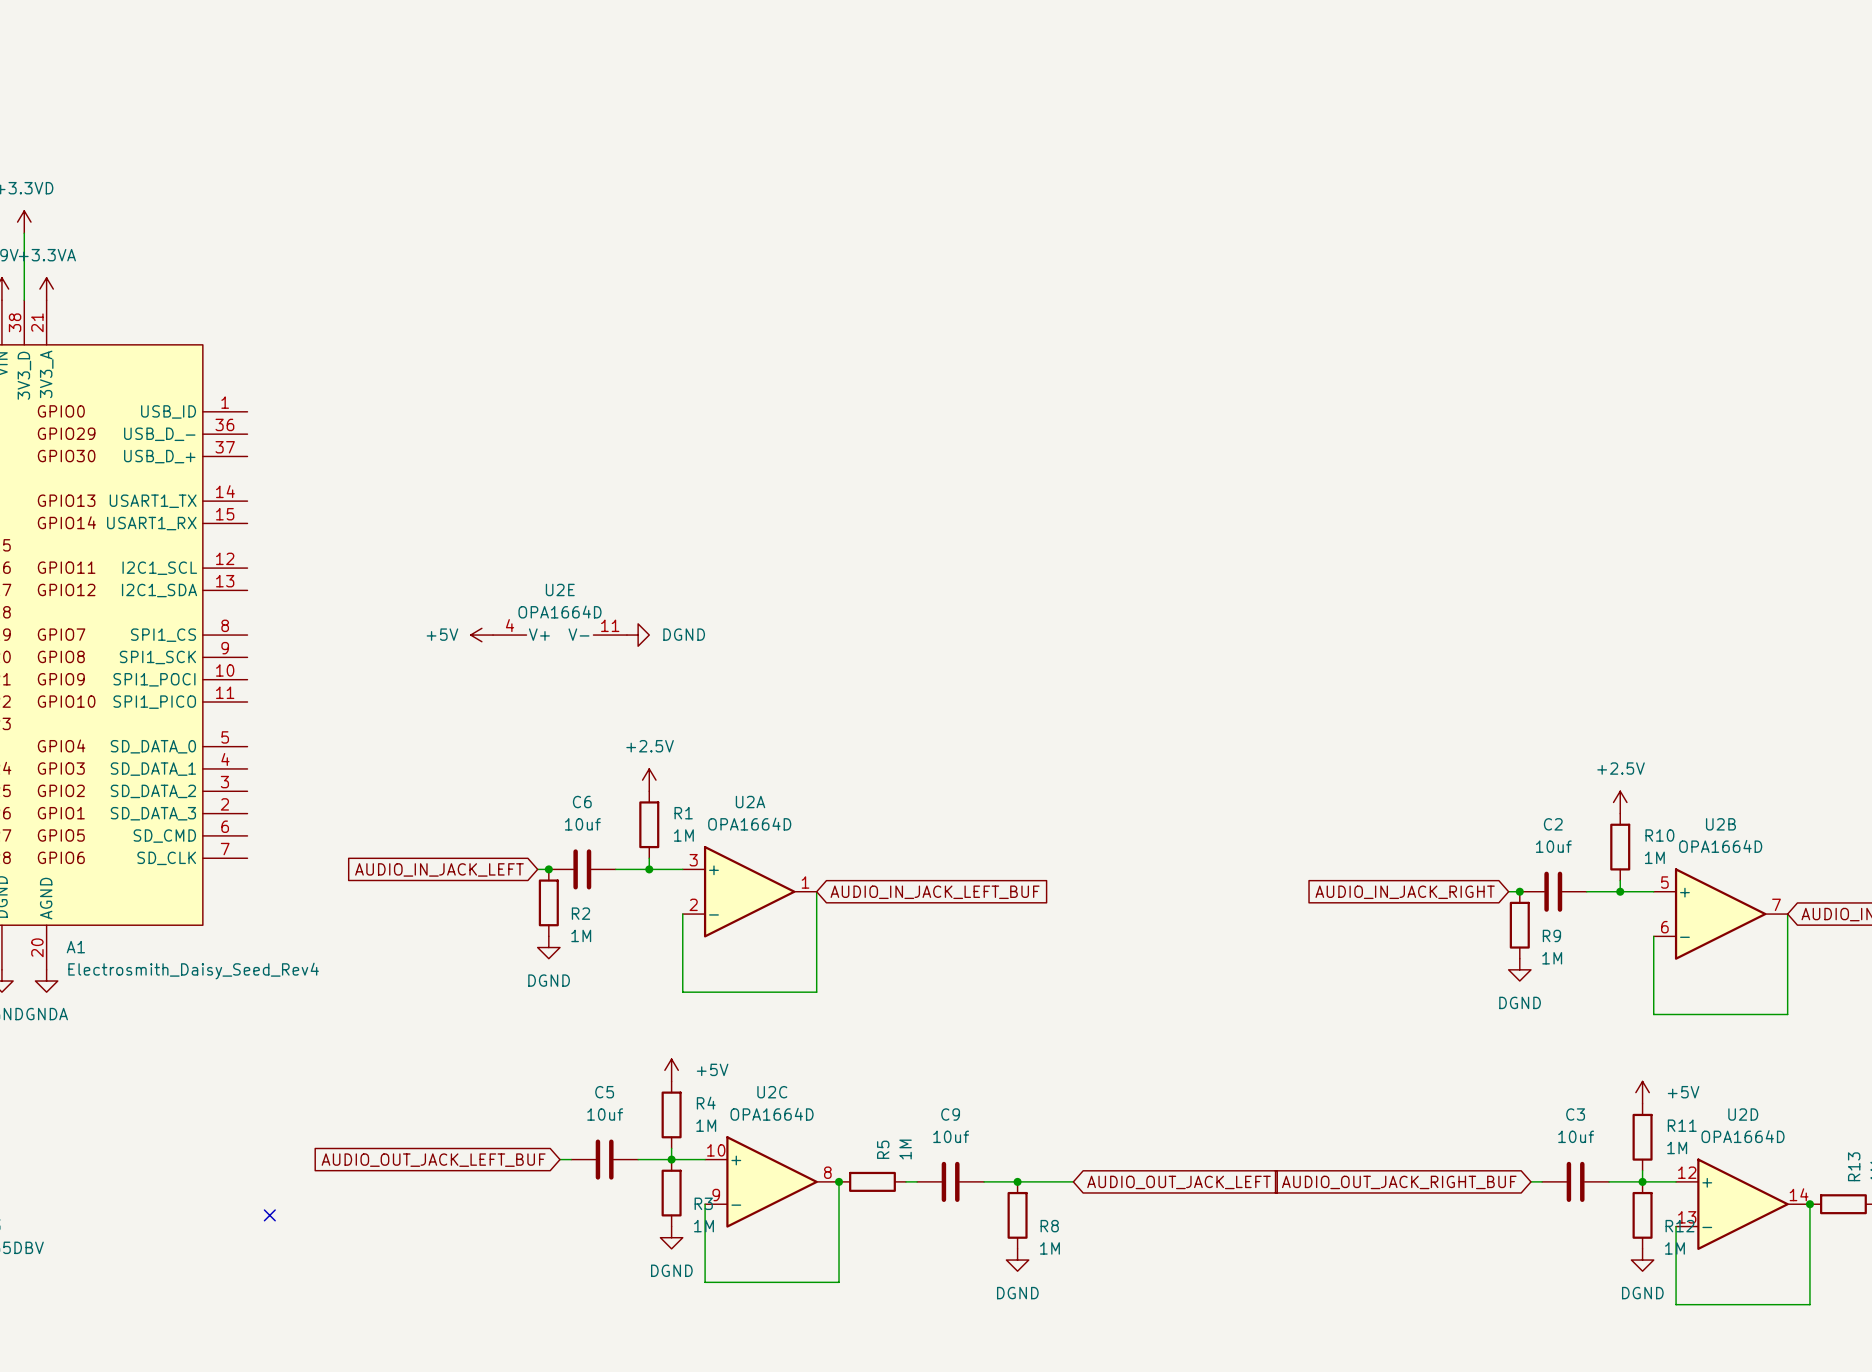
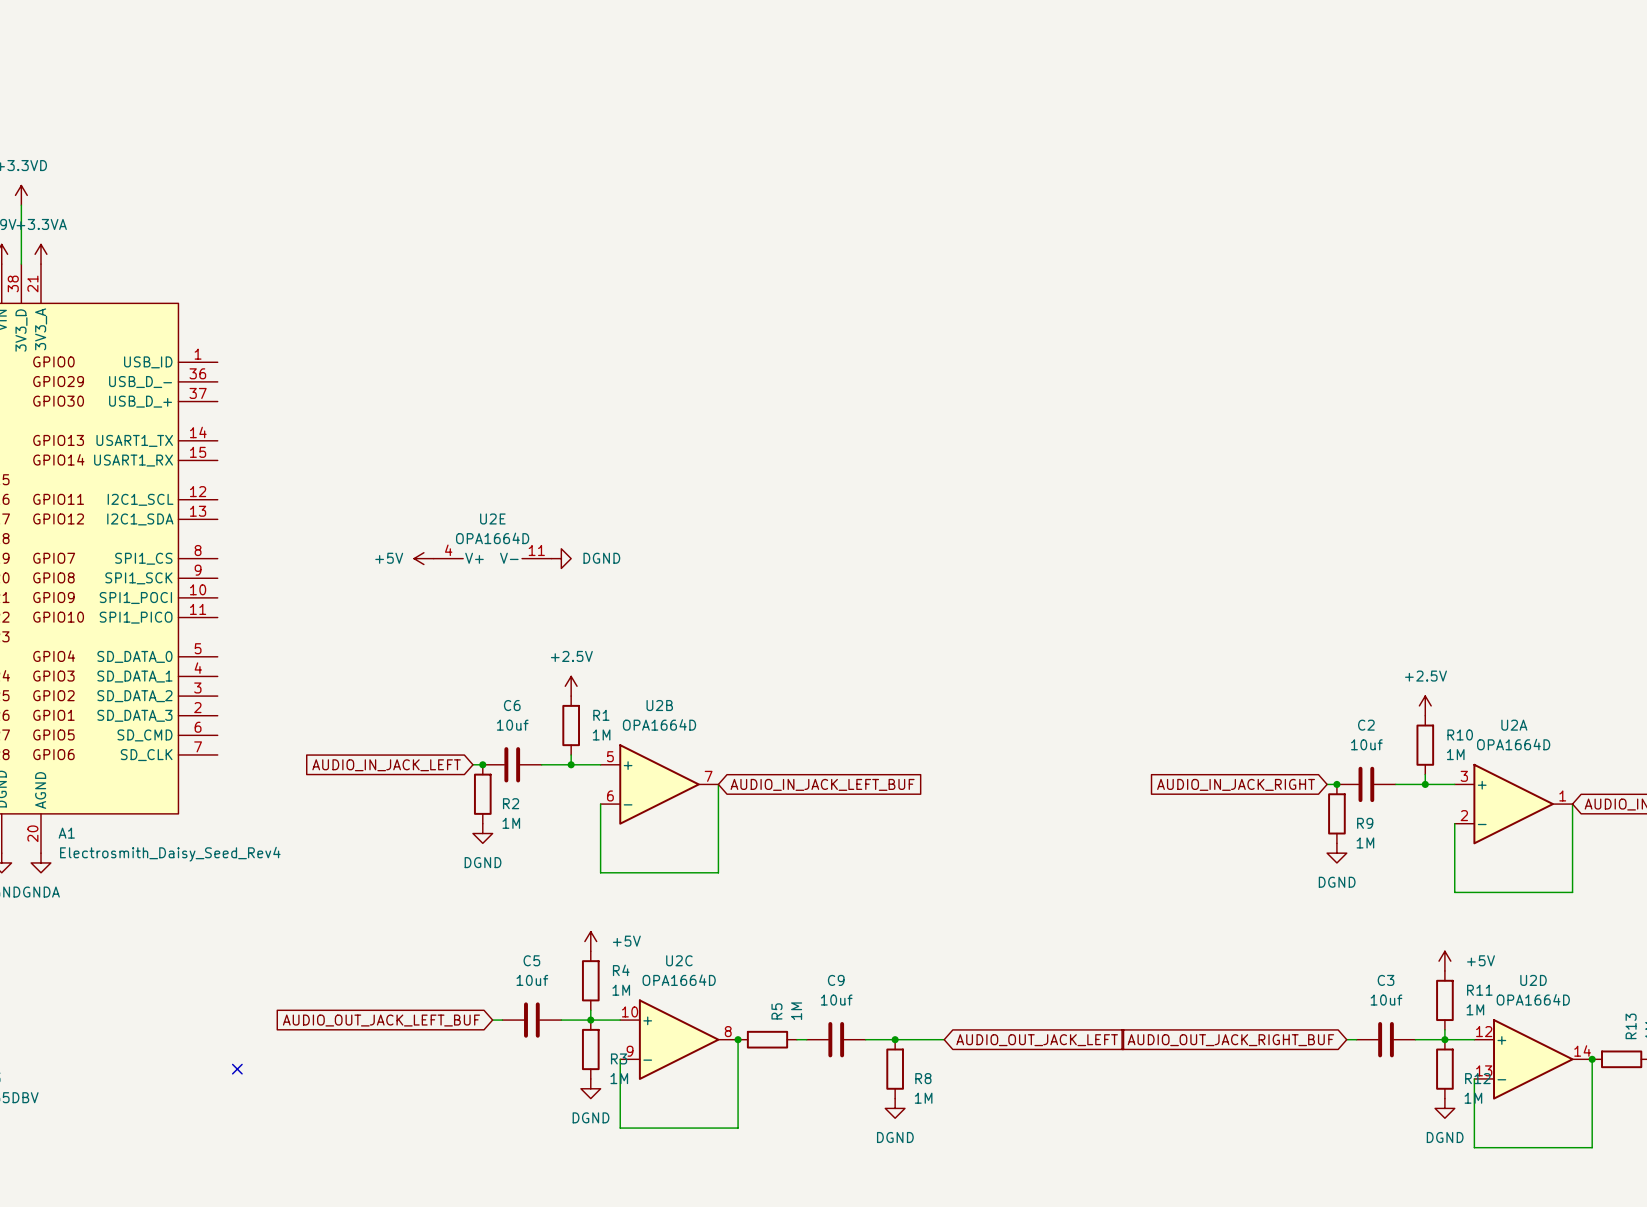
U2A position: (749, 891) -> (1513, 804)
U2B position: (1720, 914) -> (659, 784)

